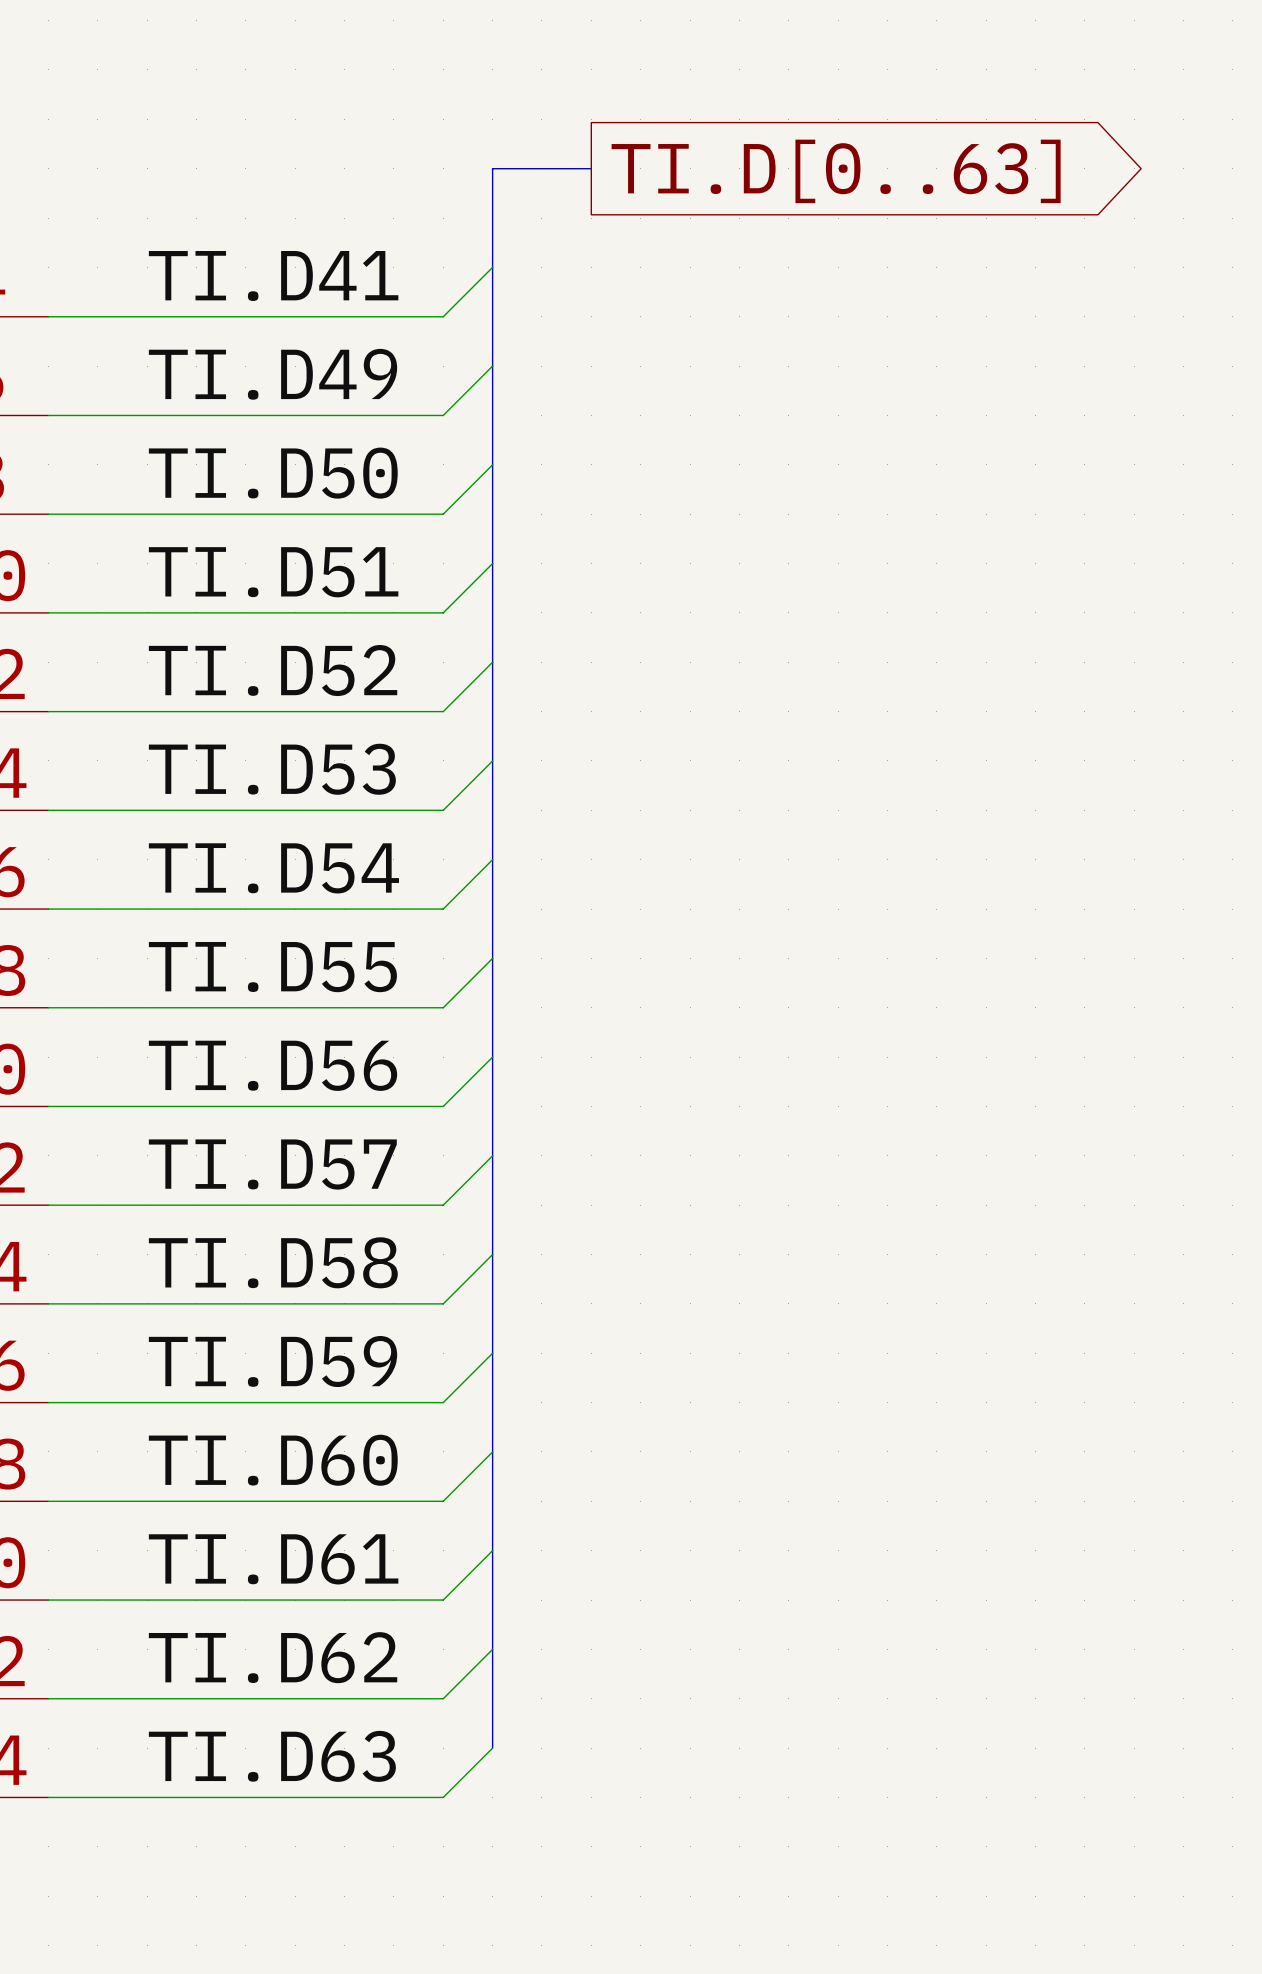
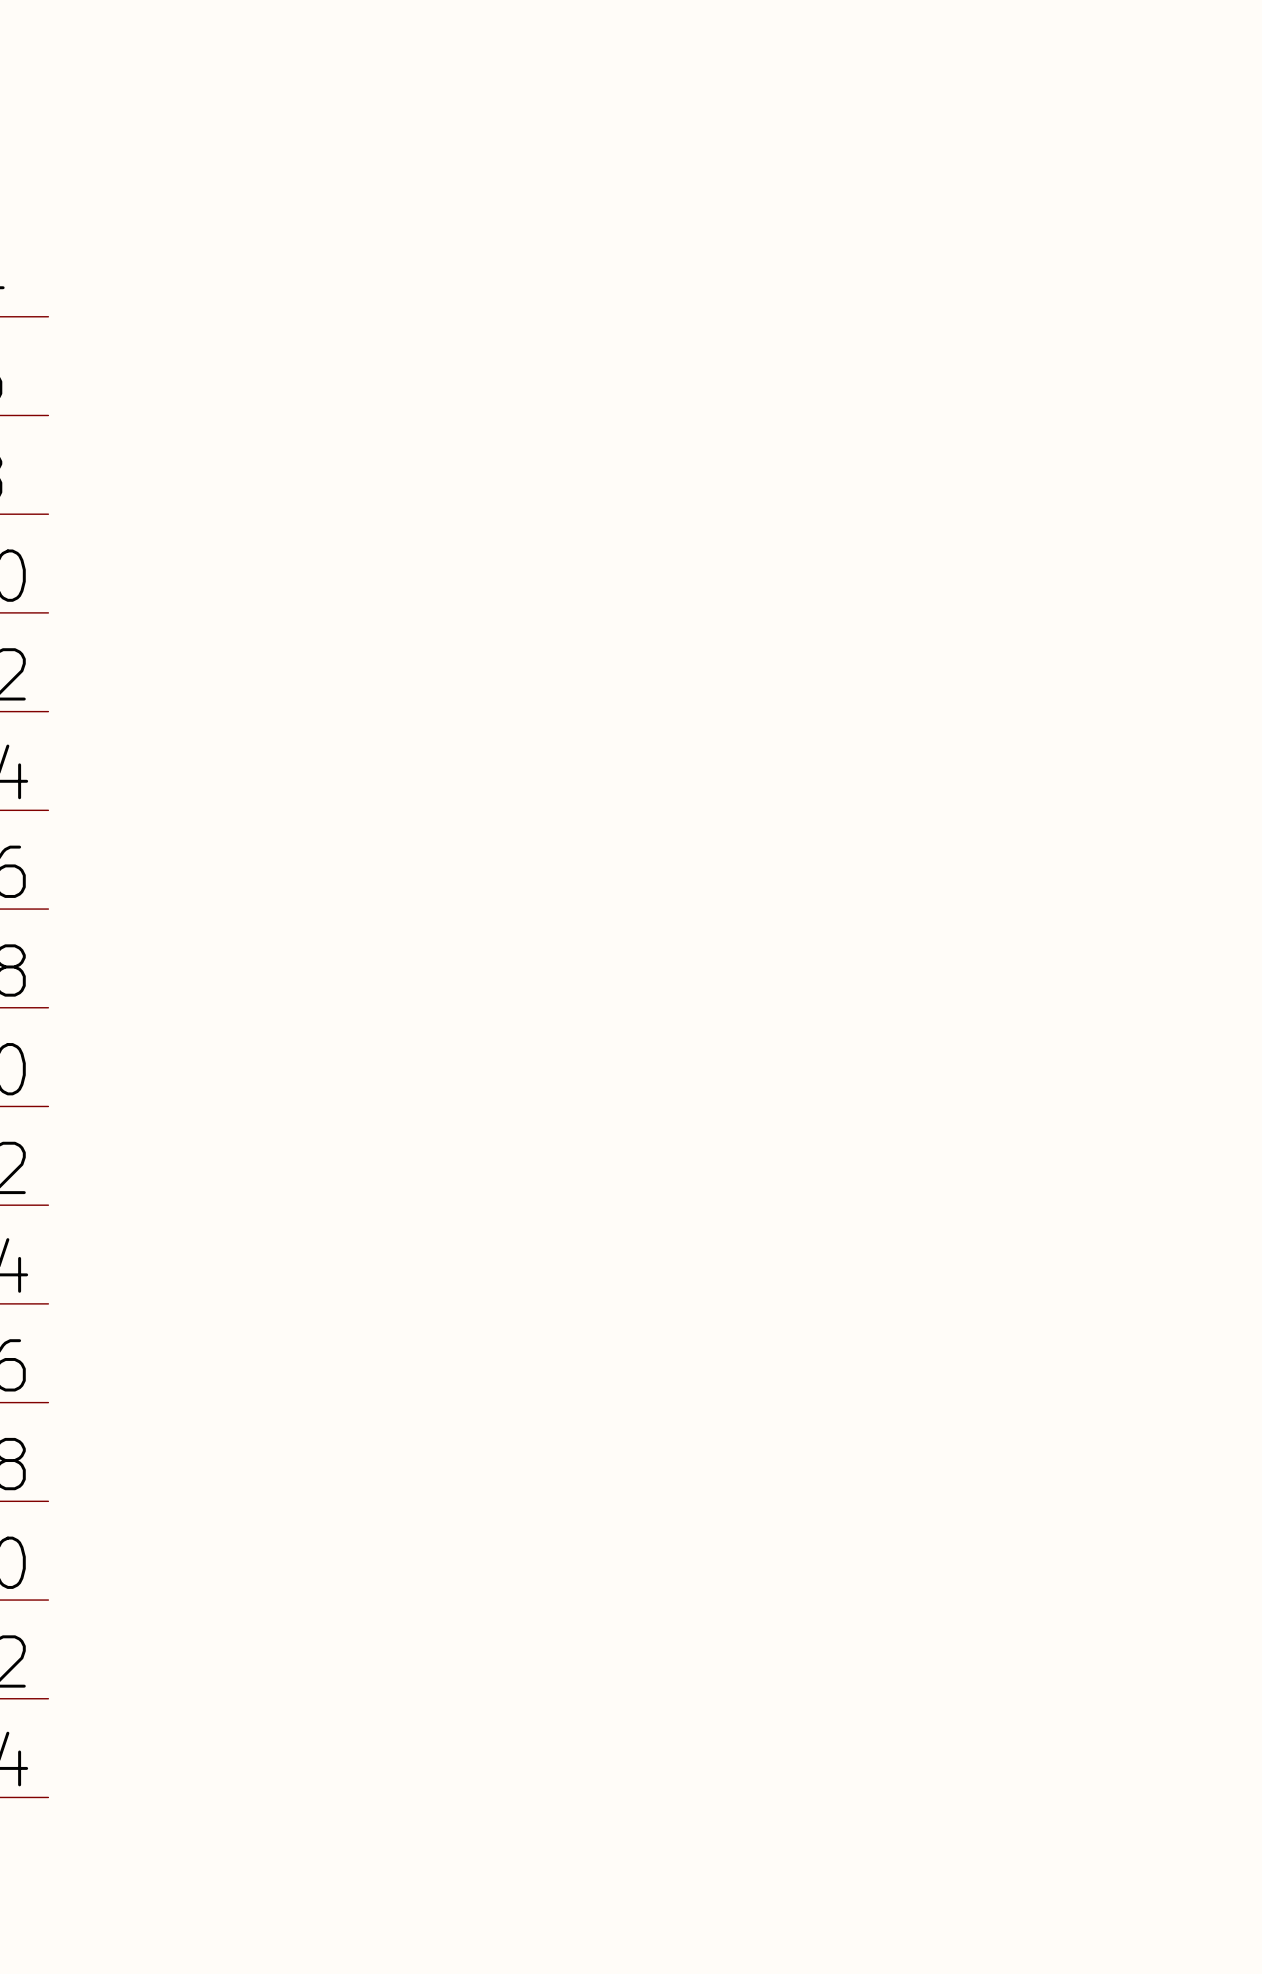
bus: (591, 168) (492, 168) (492, 1748) -> none
global label: TI.D[0..63] (836, 171) -> none
wire: (492, 267) (443, 316) (48, 316) -> none
label: TI.D41 (273, 276) -> none
wire: (492, 366) (443, 415) (48, 415) -> none
label: TI.D49 (273, 374) -> none
wire: (492, 464) (443, 514) (48, 514) -> none
label: TI.D50 (273, 473) -> none
wire: (492, 563) (443, 612) (48, 612) -> none
label: TI.D51 (273, 572) -> none
wire: (492, 662) (443, 711) (48, 711) -> none
label: TI.D52 (273, 670) -> none
wire: (492, 760) (443, 810) (48, 810) -> none
label: TI.D53 (272, 769) -> none
wire: (492, 859) (443, 909) (48, 909) -> none
label: TI.D54 (273, 868) -> none
wire: (492, 958) (443, 1007) (48, 1007) -> none
label: TI.D55 (272, 967) -> none
wire: (492, 1057) (443, 1106) (48, 1106) -> none
label: TI.D56 (273, 1065) -> none
wire: (492, 1155) (443, 1205) (48, 1205) -> none
label: TI.D57 (272, 1164) -> none
wire: (492, 1254) (443, 1303) (48, 1303) -> none
label: TI.D58 (273, 1262) -> none
wire: (492, 1353) (443, 1402) (48, 1402) -> none
label: TI.D59 (273, 1361) -> none
wire: (492, 1451) (443, 1501) (48, 1501) -> none
label: TI.D60 (273, 1460) -> none
wire: (492, 1550) (443, 1600) (48, 1600) -> none
label: TI.D61 (273, 1559) -> none
wire: (492, 1649) (443, 1698) (48, 1698) -> none
label: TI.D62 (273, 1657) -> none
wire: (492, 1748) (443, 1797) (48, 1797) -> none
label: TI.D63 (272, 1756) -> none

